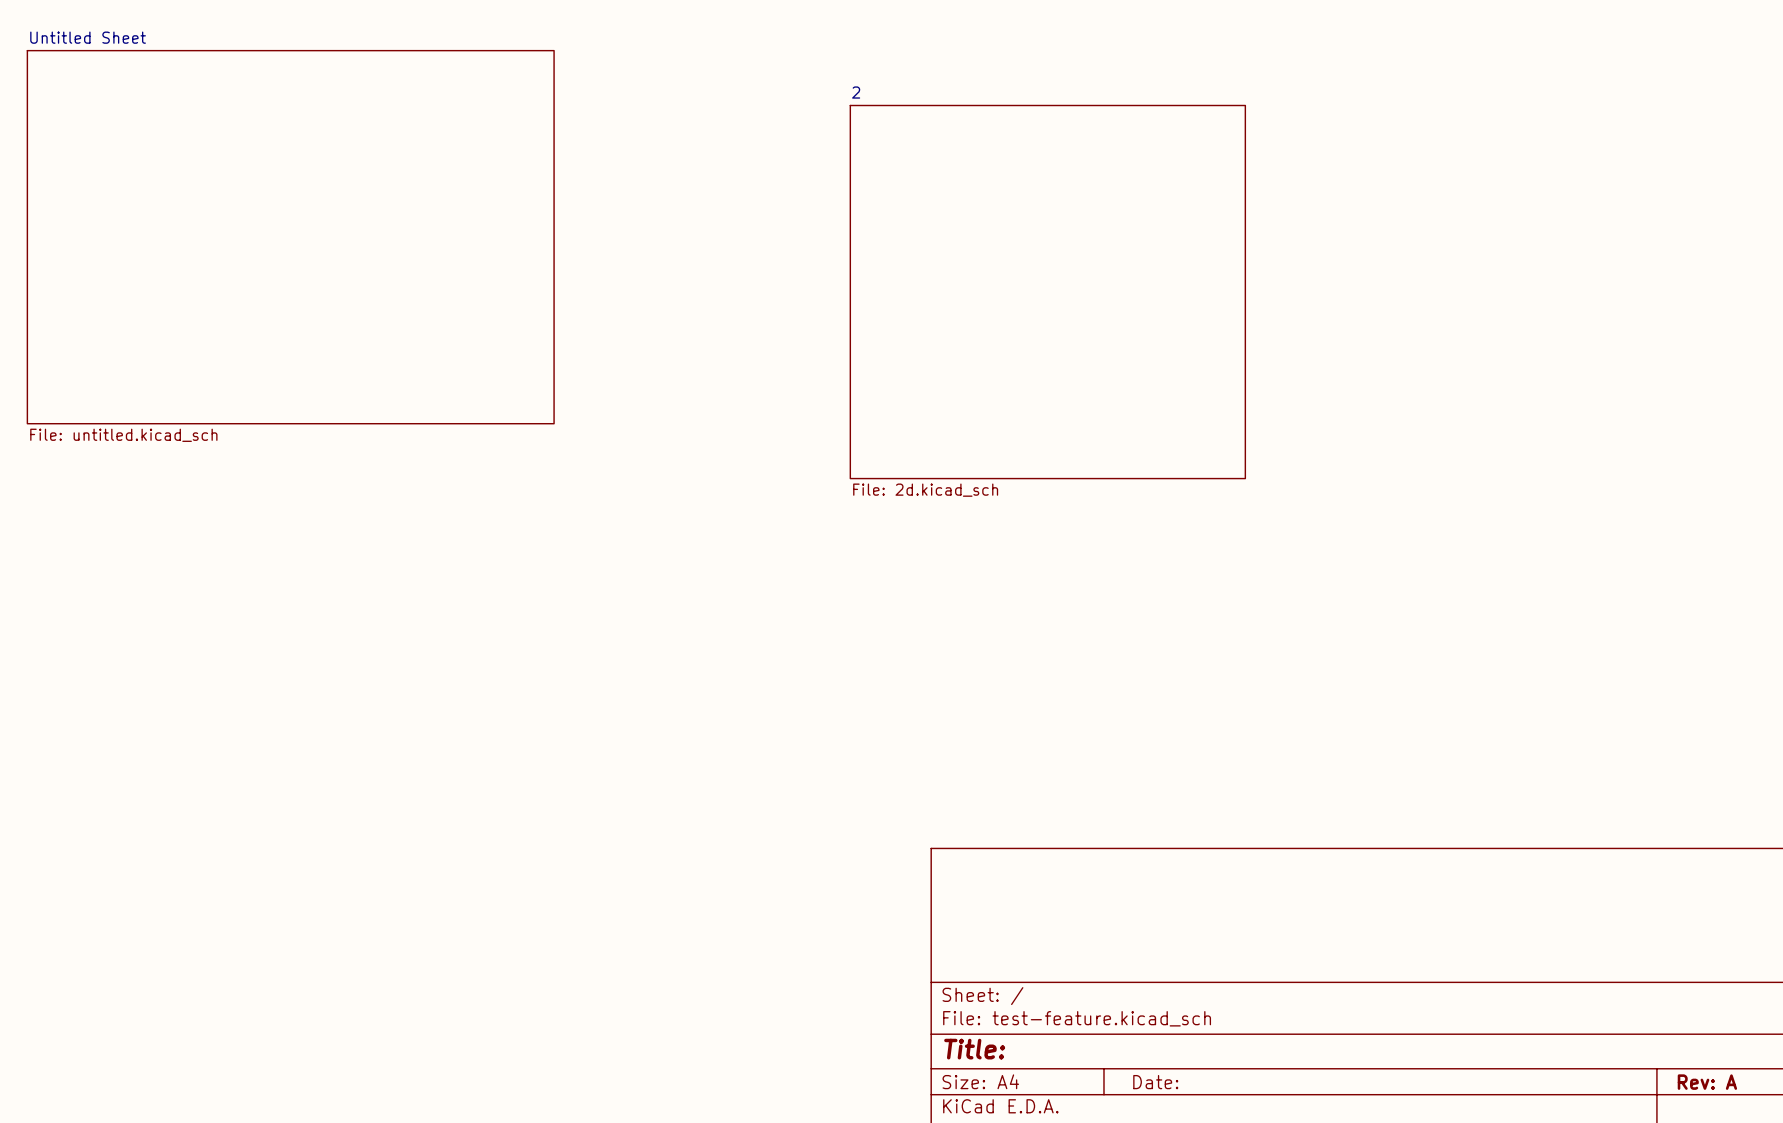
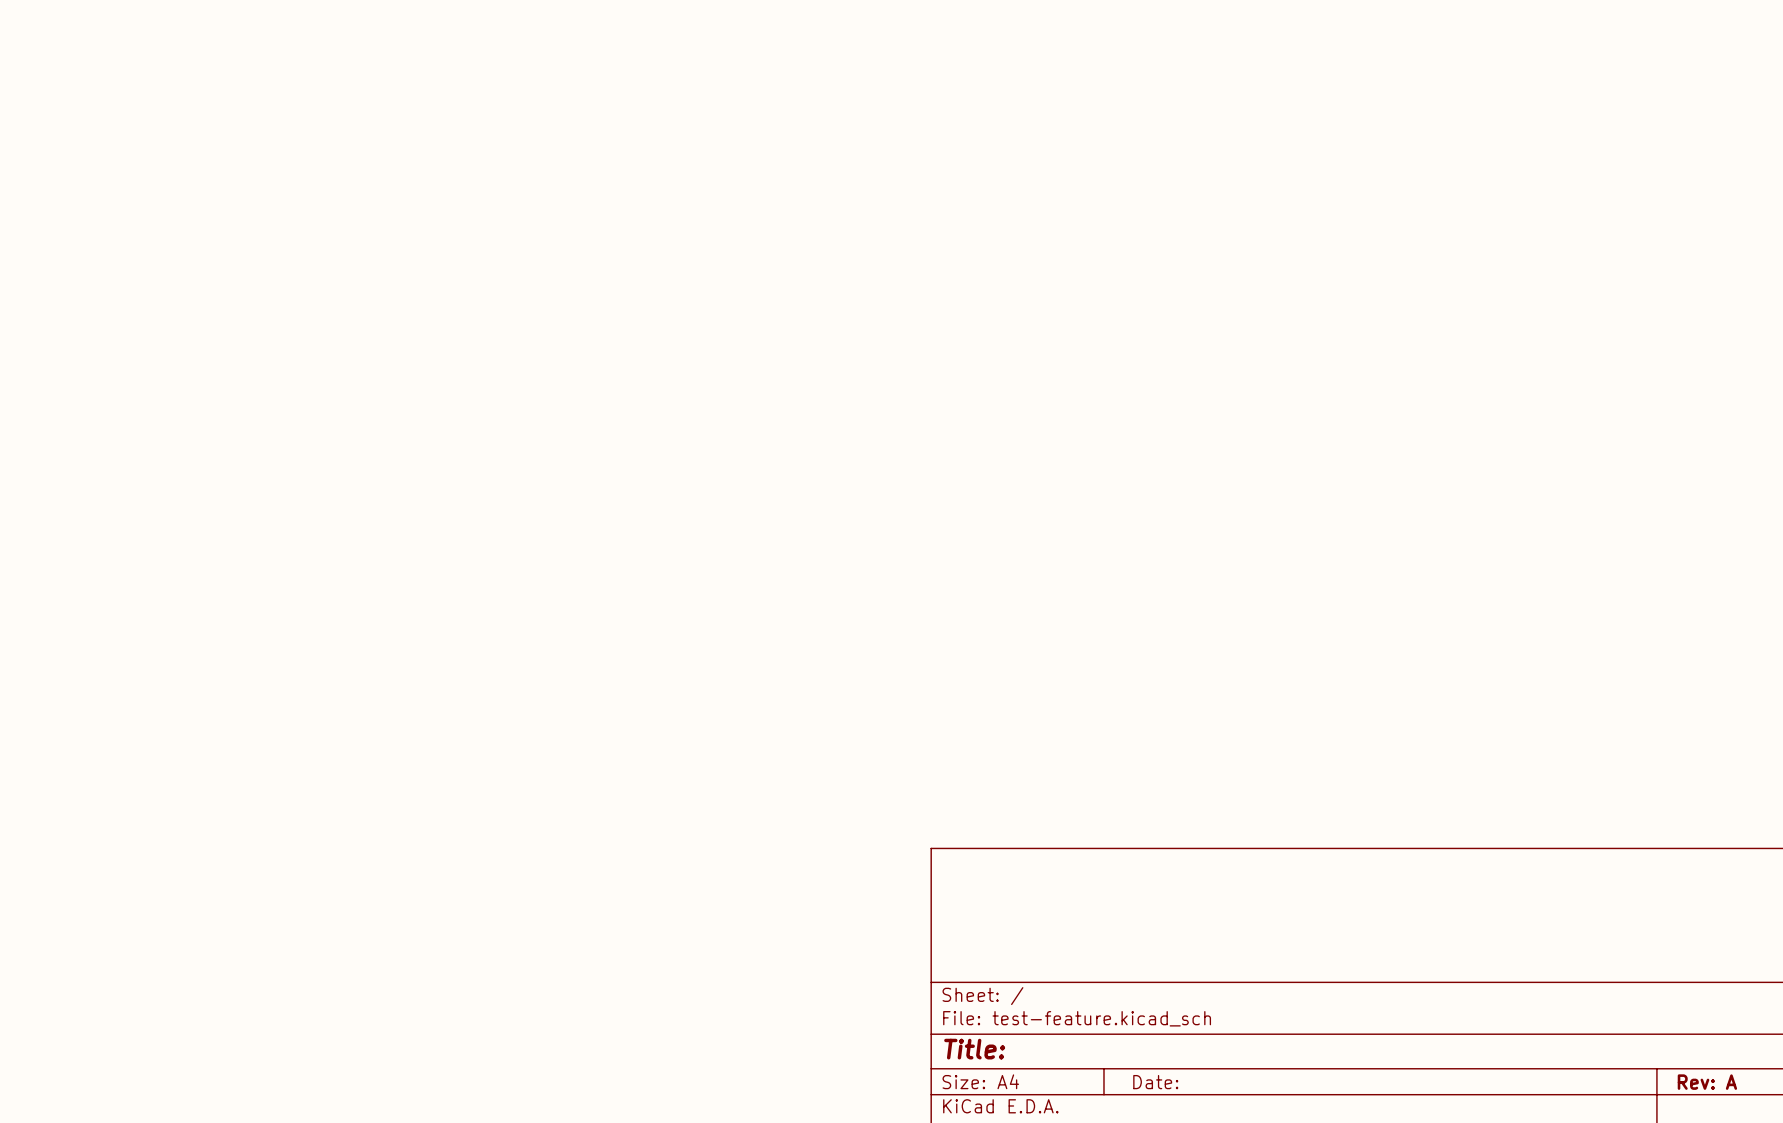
sheet Untitled Sheet: File: untitled.kicad_sch (290, 237) -> none
sheet 2: File: 2d.kicad_sch (1047, 292) -> none

